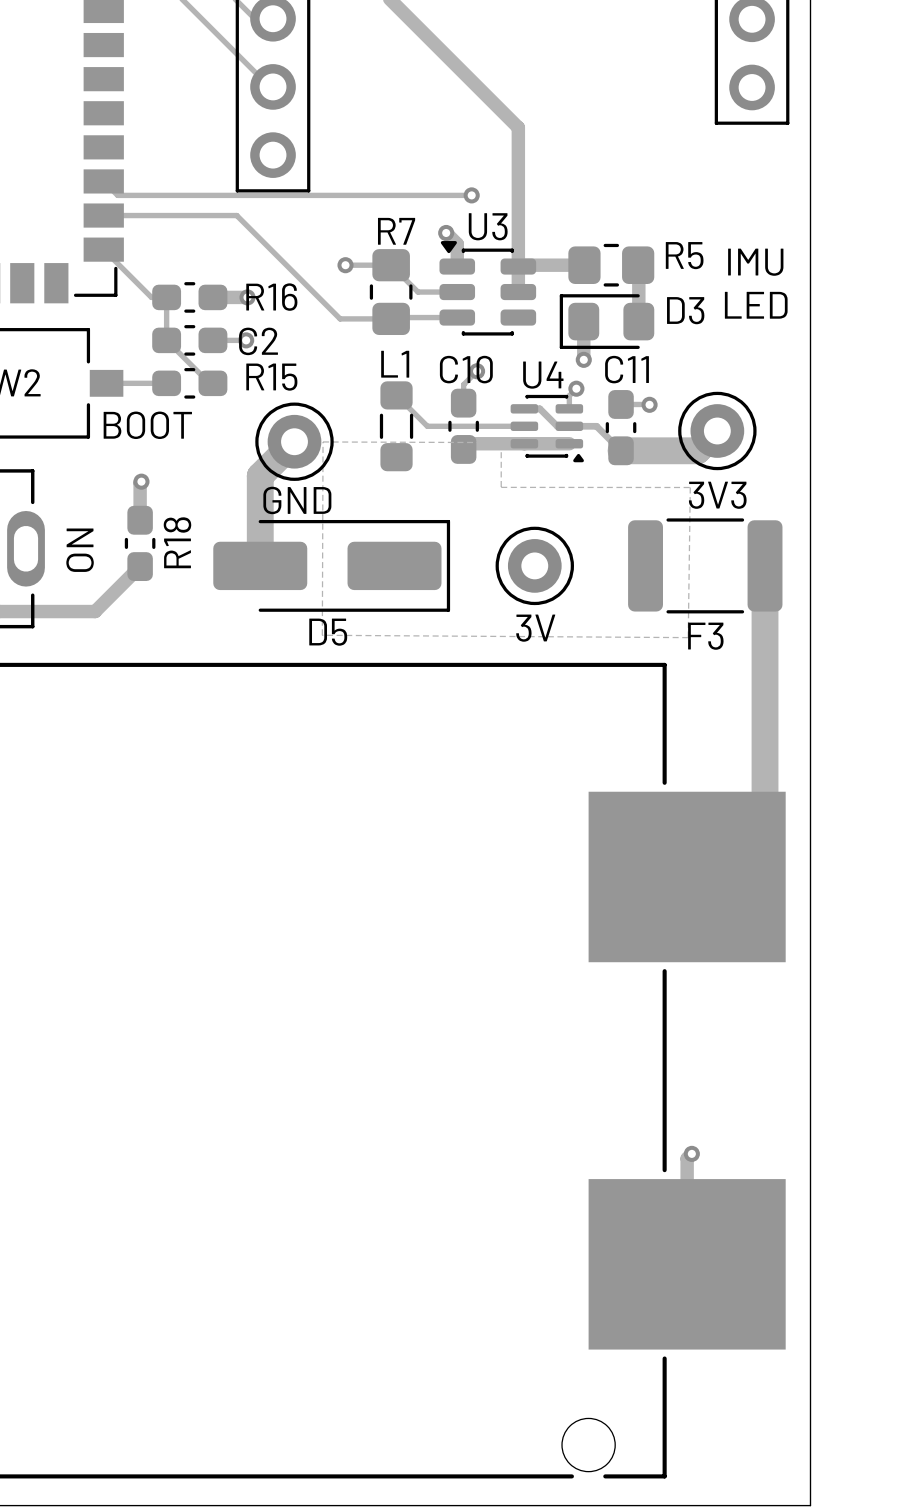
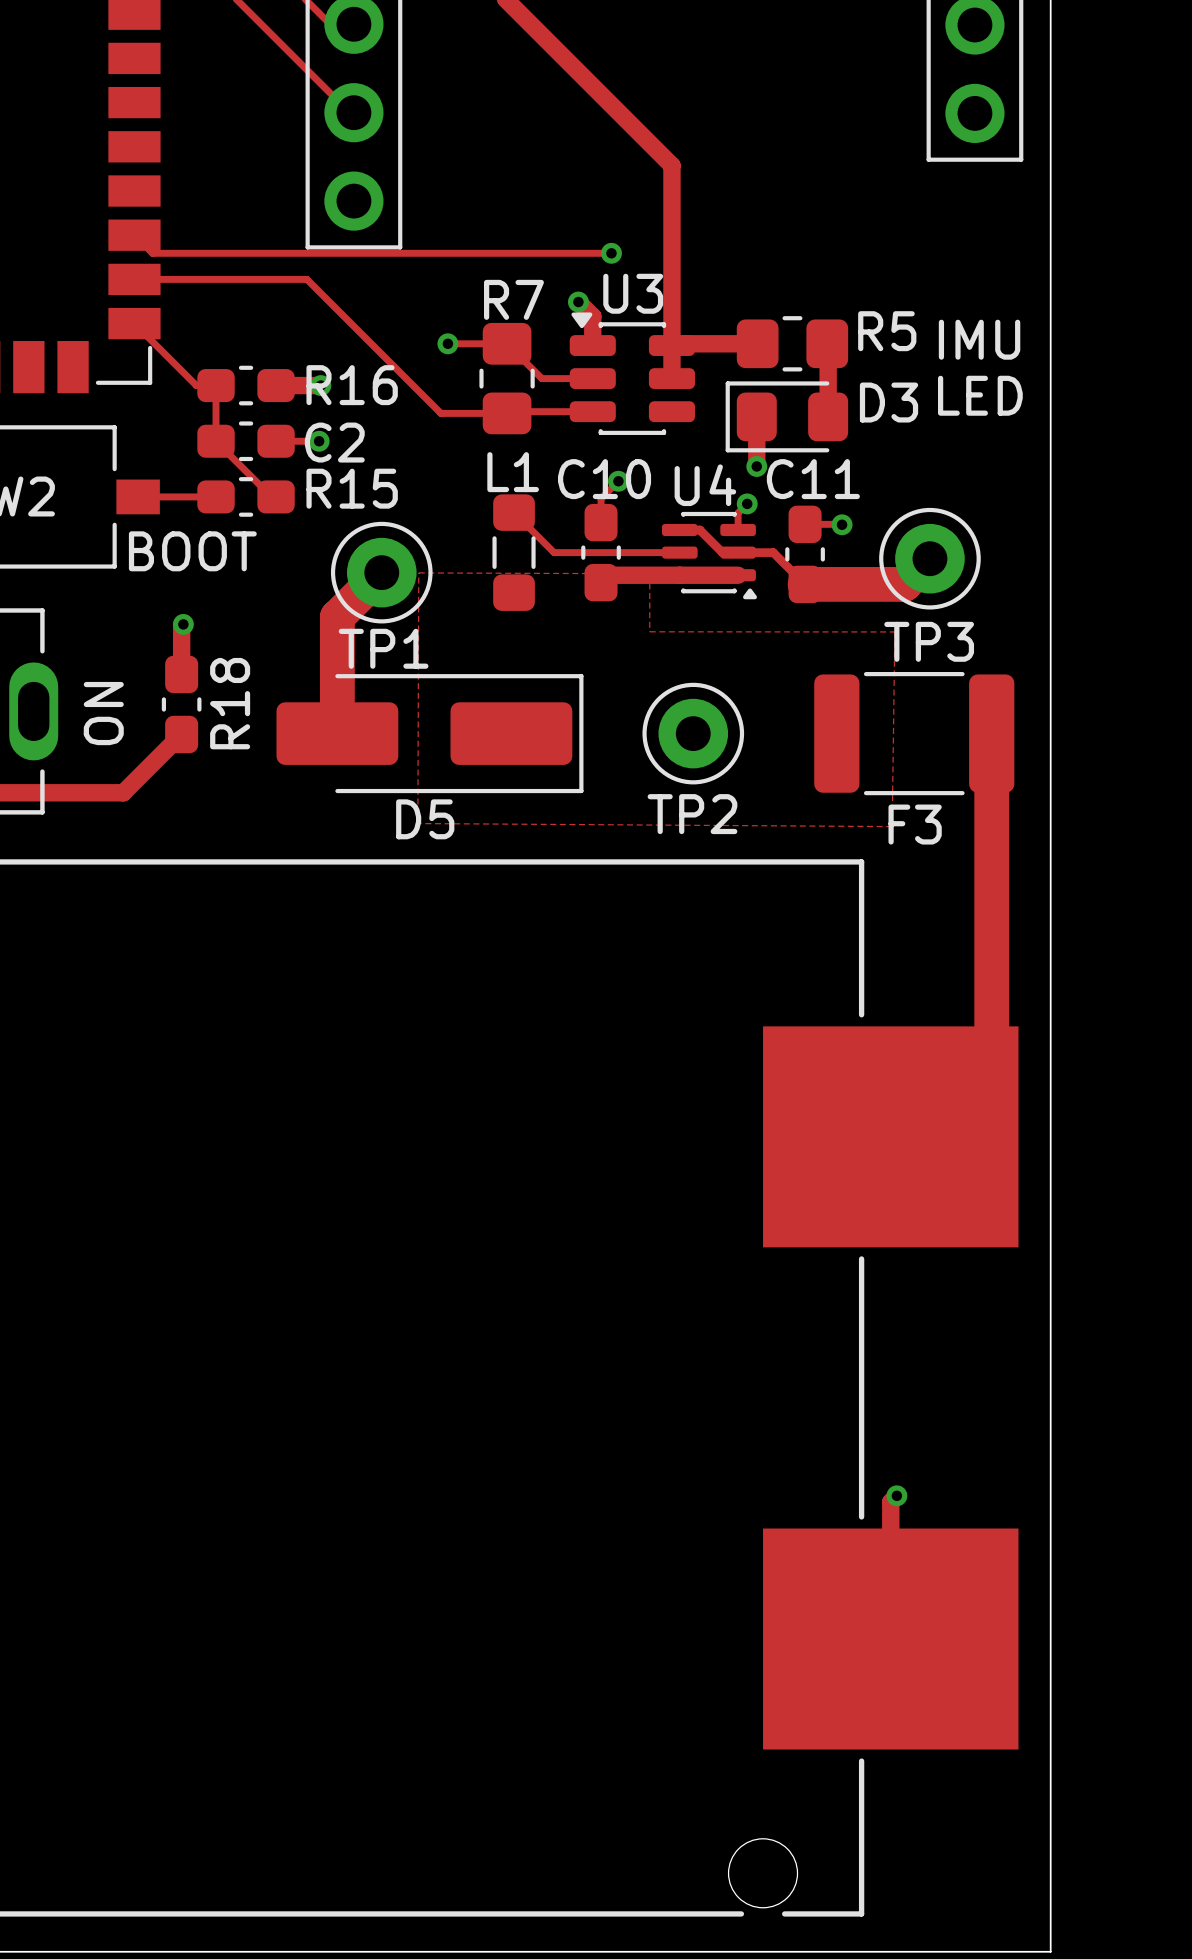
3V3 name: 3V3 (717, 495) -> TP3 (929, 641)
GND name: GND (297, 500) -> TP1 (383, 648)
3V name: 3V (535, 628) -> TP2 (692, 814)

